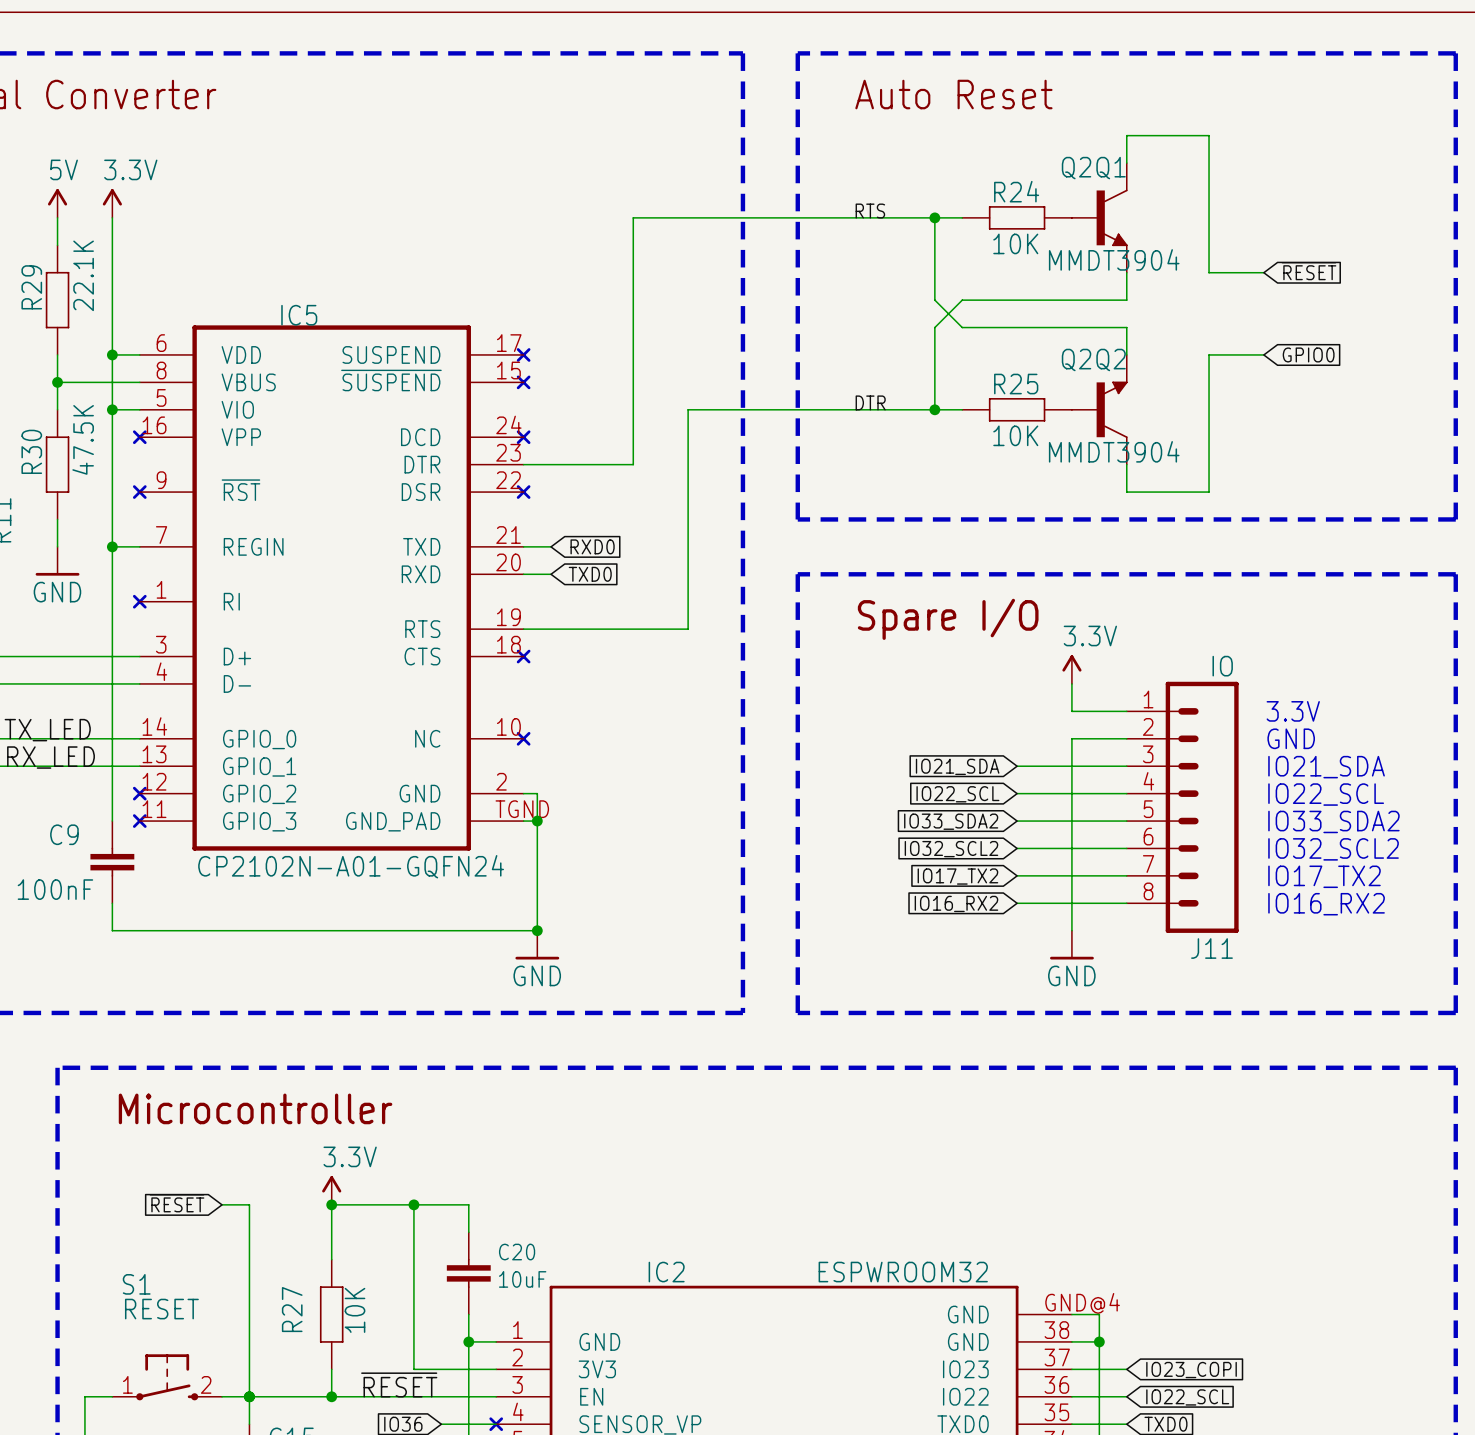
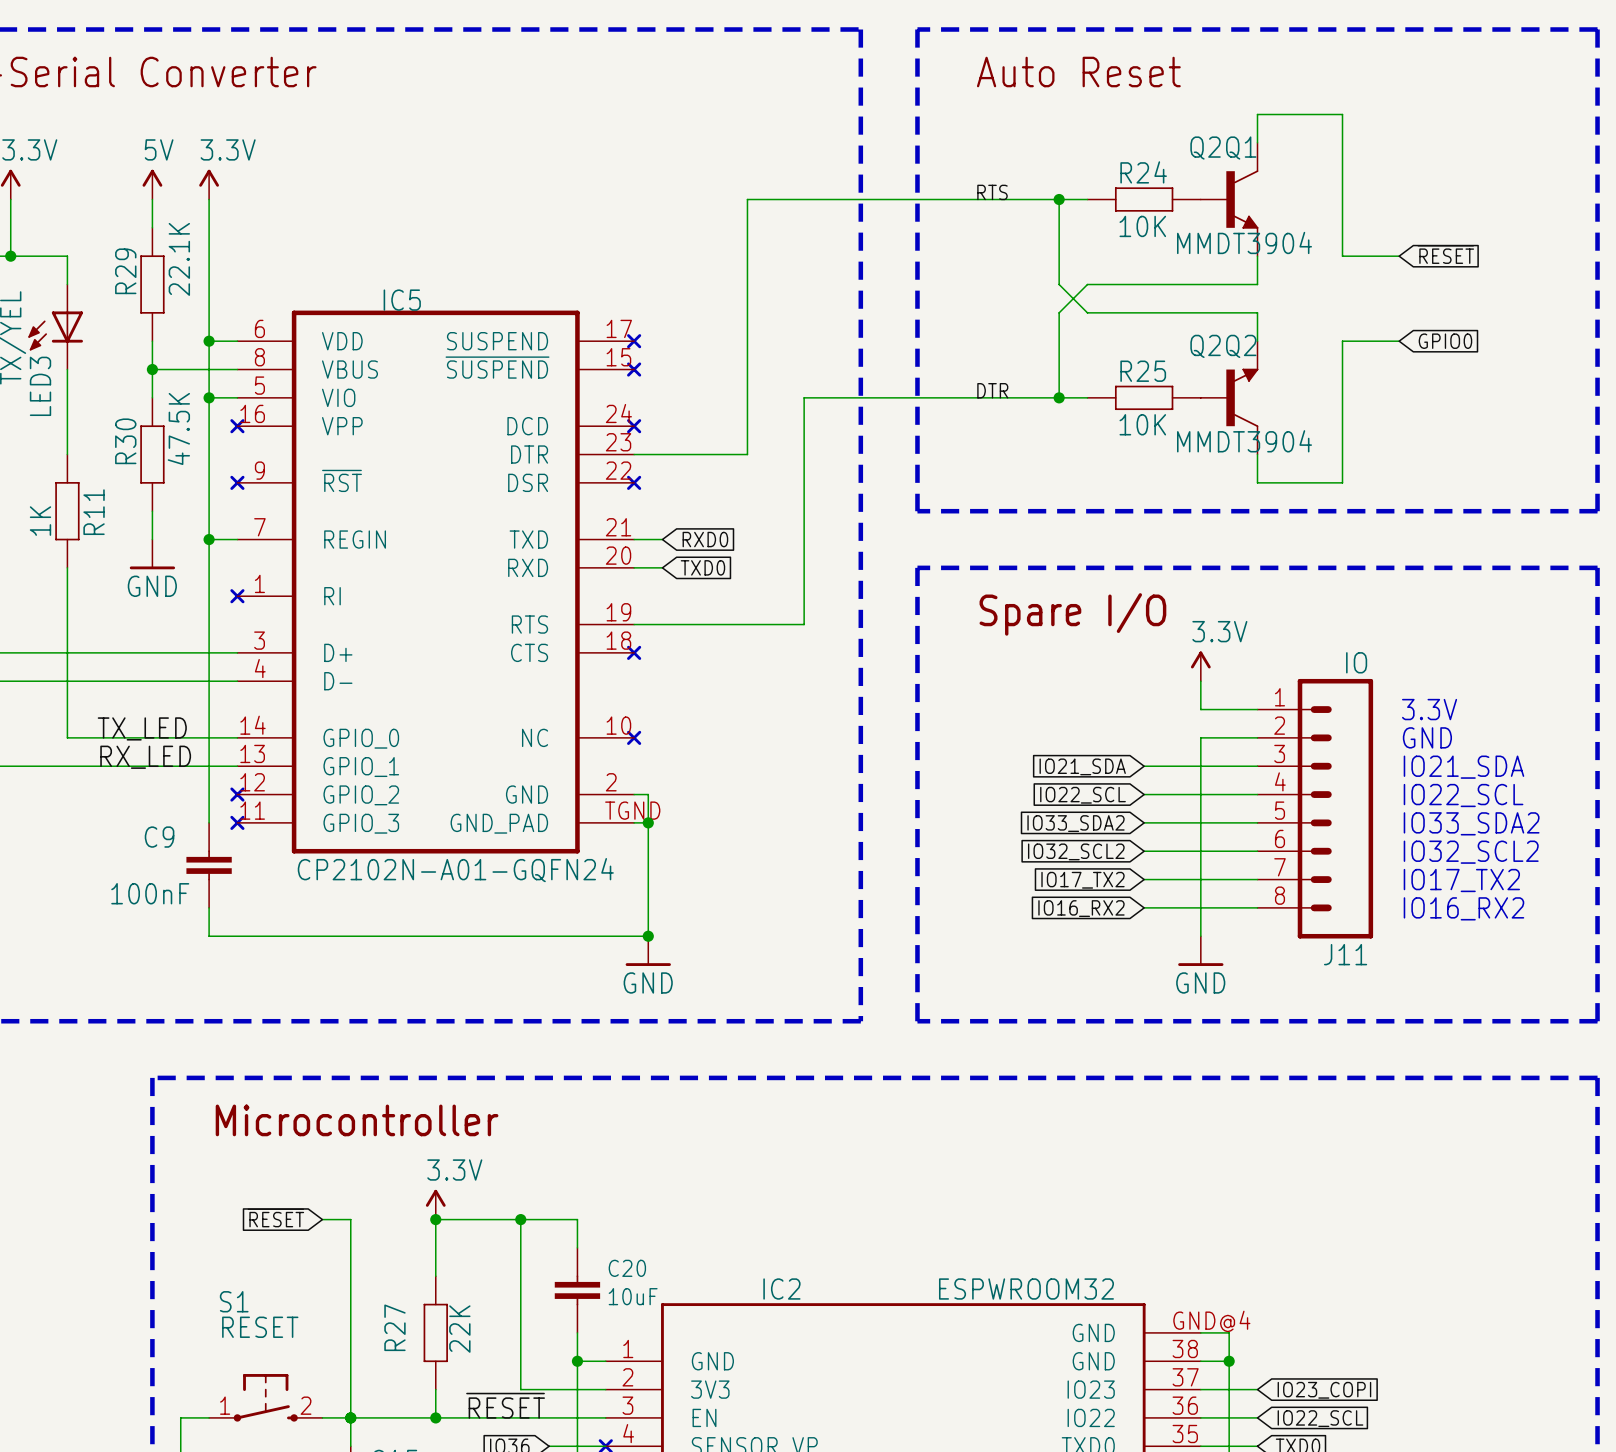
R27 value: 10K (355, 1310) -> 22K (459, 1329)

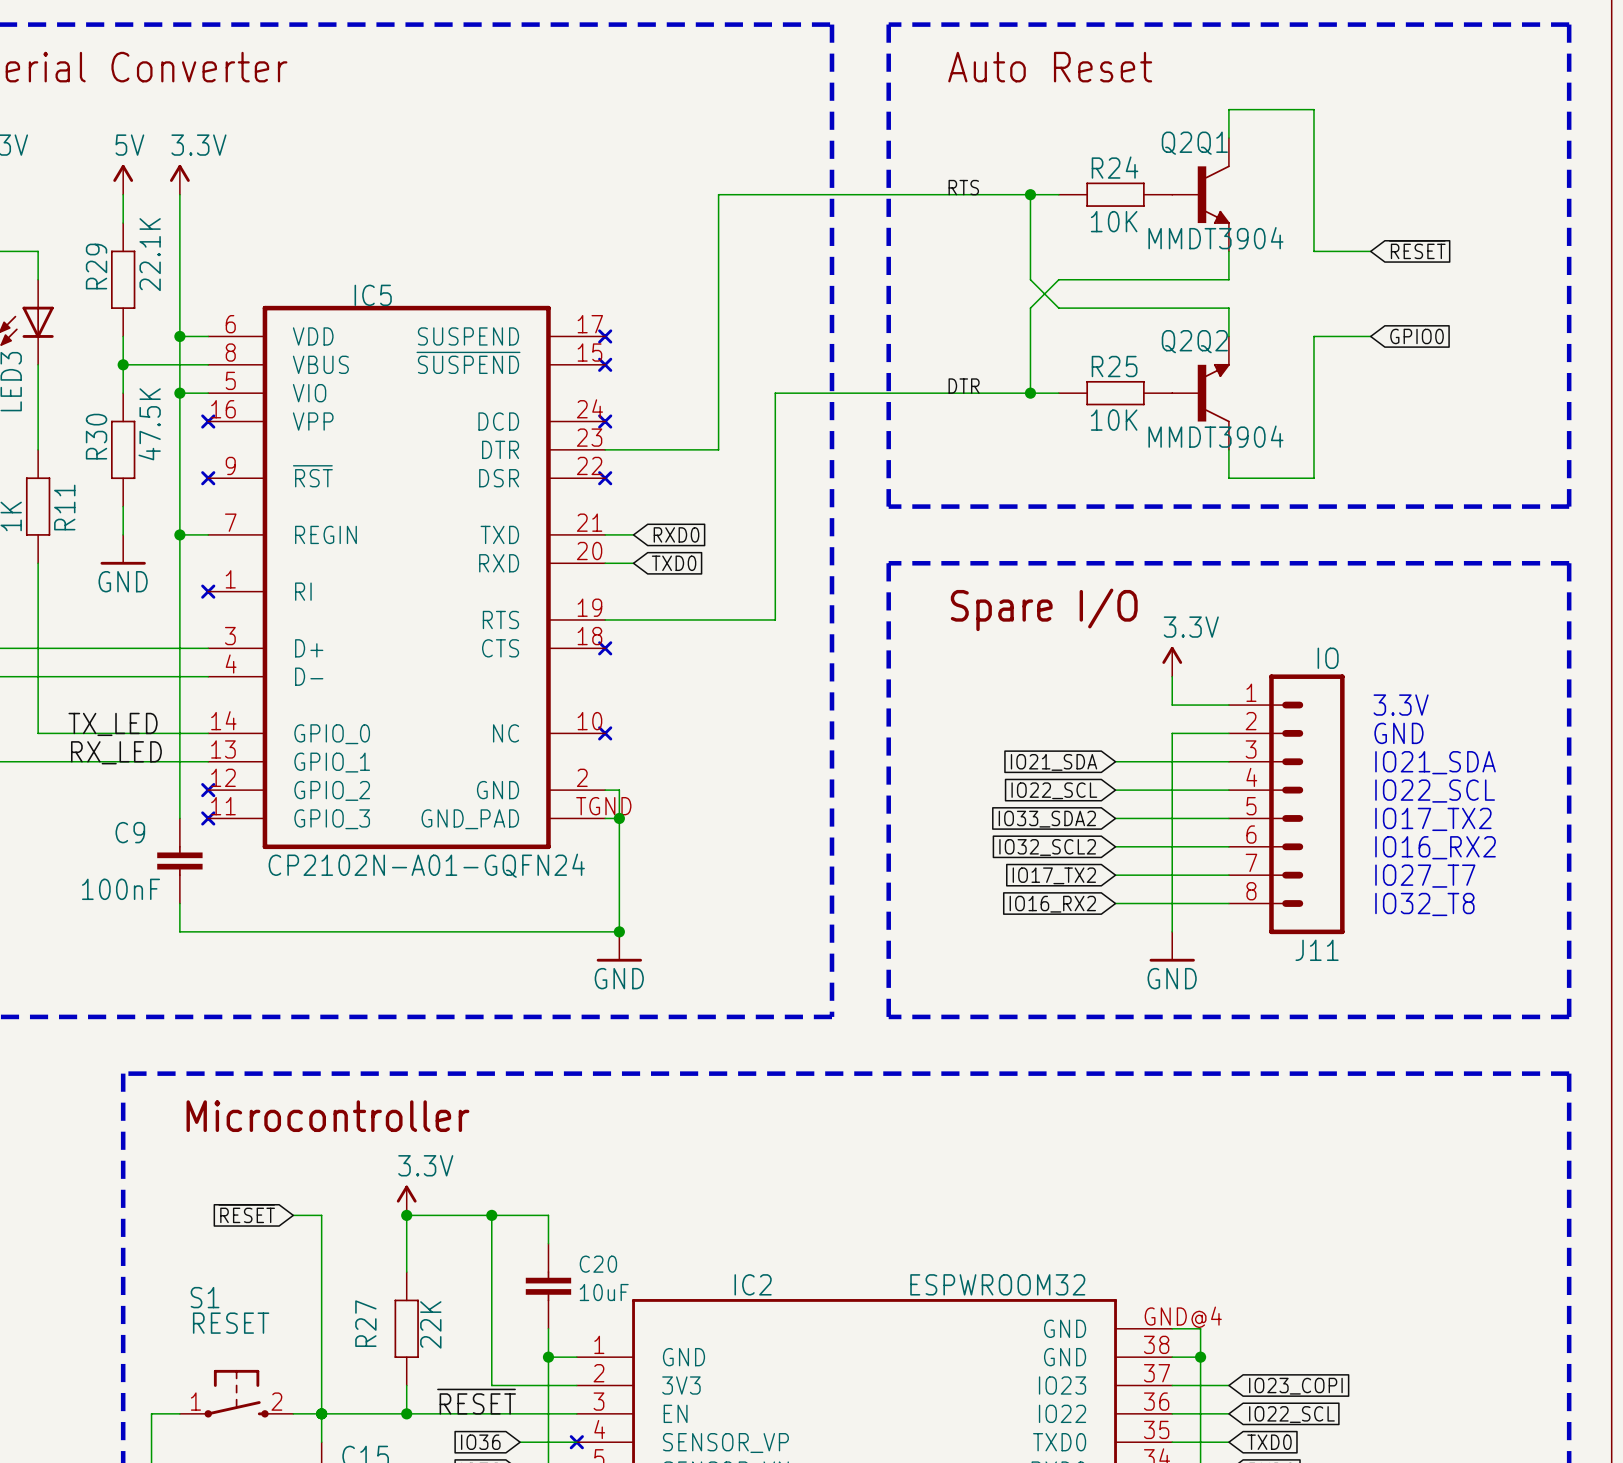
text: IO33_SDA2 (1471, 823) -> IO17_TX2 (1433, 819)
text: IO32_SCL2 (1471, 852) -> IO16_RX2 (1435, 847)
text: IO17_TX2 (1461, 880) -> IO27_T7 (1425, 876)
text: IO16_RX2 (1463, 908) -> IO32_T8 (1424, 904)

